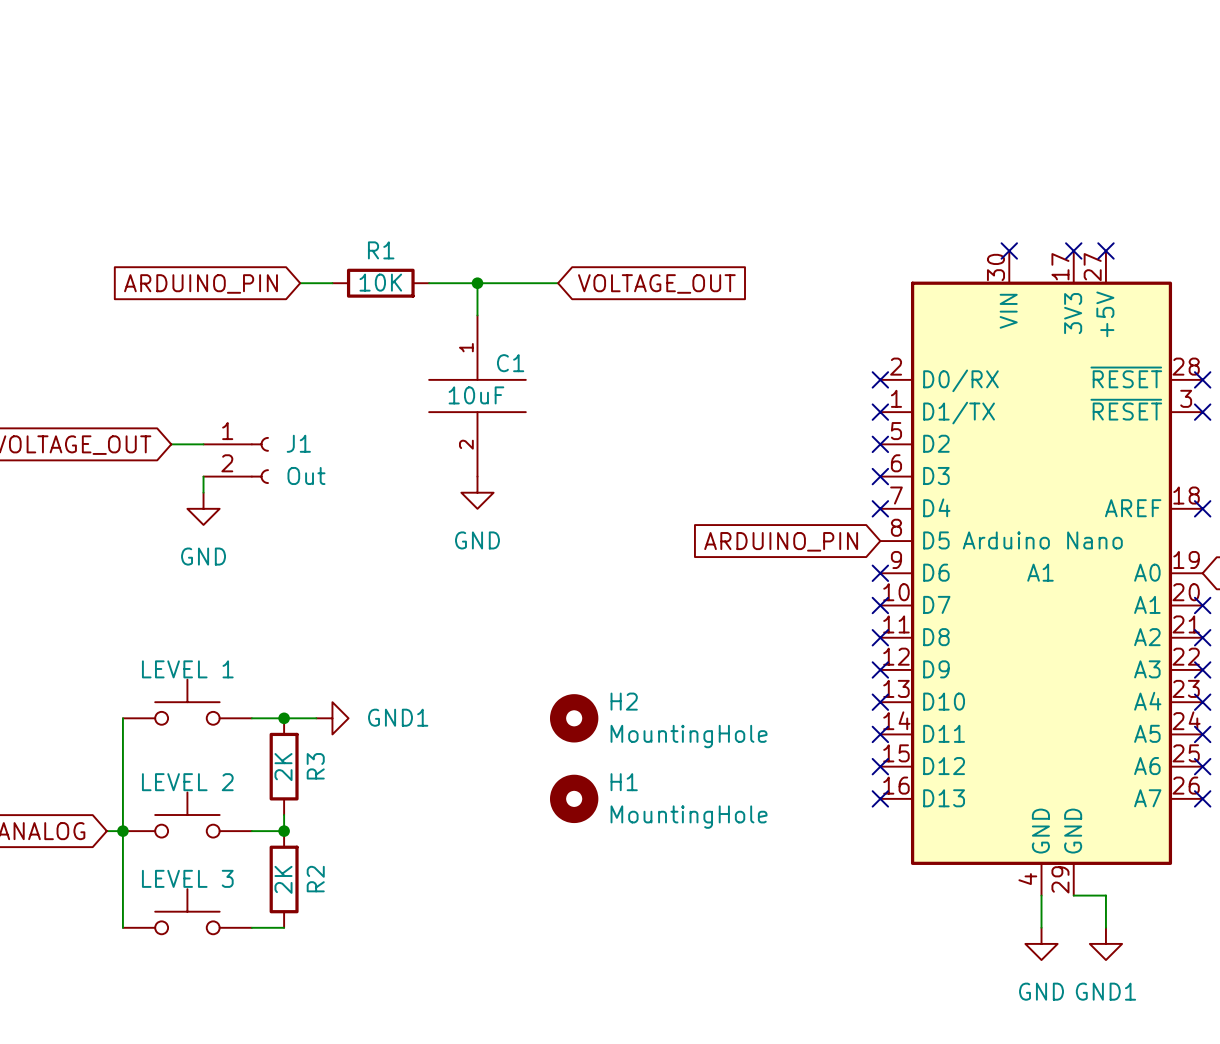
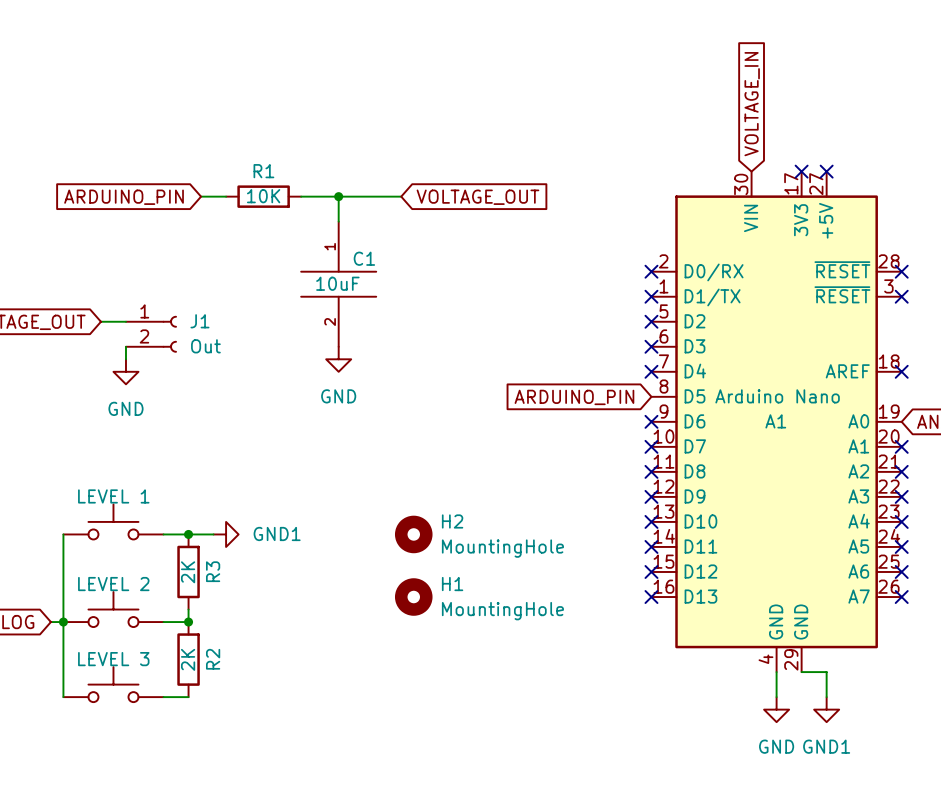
global label: none -> VOLTAGE_IN (752, 104)
no-connect mark: (1009, 250) -> none

